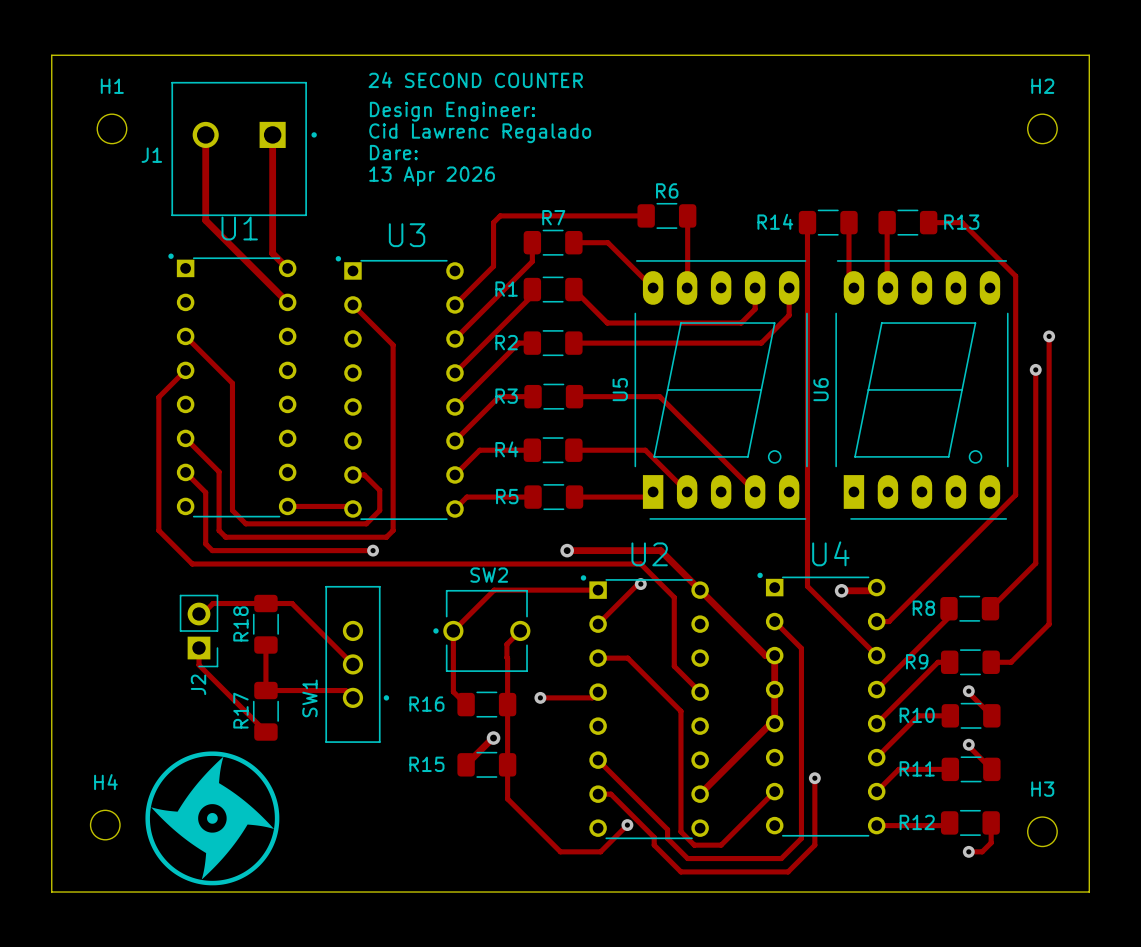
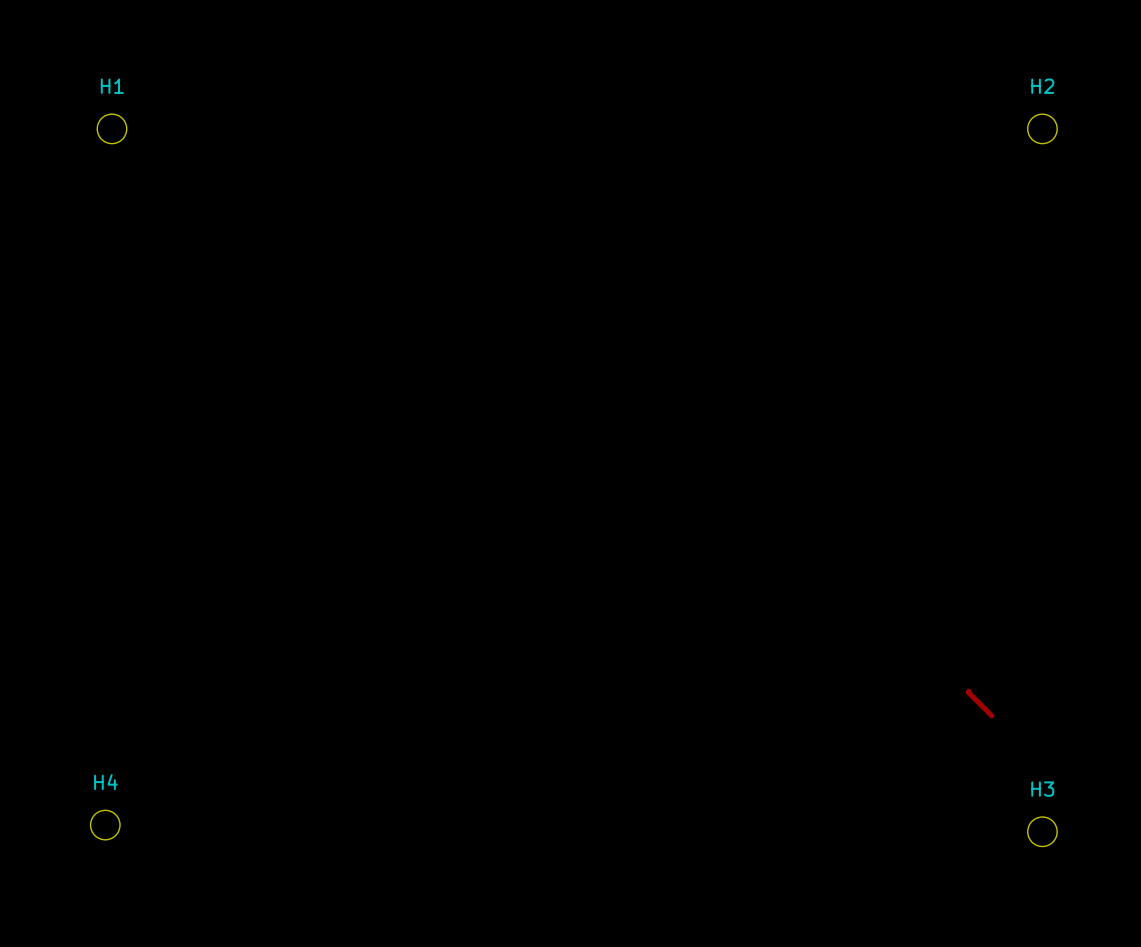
board edge: (51, 55) (1089, 55) (1089, 892) (51, 892) (51, 55) -> none
text: 24 SECOND COUNTER (475, 80) -> none
text: Design Engineer: (452, 111) -> none
text: Cid Lawrenc Regalado (480, 133) -> none
track: (205, 134) (205, 220) (287, 302) -> none
track: (272, 134) (272, 253) (287, 268) -> none
J1: (244, 148) -> none
text: Dare: (393, 152) -> none
text: 13 Apr 2026 (432, 176) -> none
track: (646, 215) (500, 215) (493, 222) (493, 266) (454, 304) -> none
R6: (666, 215) -> none
track: (687, 215) (687, 287) -> none
track: (807, 222) (807, 586) (876, 655) -> none
R14: (828, 222) -> none
track: (848, 222) (848, 282) (853, 287) -> none
track: (887, 222) (887, 287) -> none
R13: (907, 222) -> none
track: (928, 222) (962, 222) (1015, 276) (1015, 494) (889, 621) (876, 621) -> none
track: (532, 242) (532, 261) (454, 338) -> none
R7: (553, 242) -> none
track: (573, 242) (607, 242) (653, 287) -> none
track: (755, 287) (755, 309) (741, 323) (607, 323) (573, 289) -> none
track: (789, 287) (789, 315) (761, 343) (573, 343) -> none
track: (532, 289) (532, 295) (454, 372) -> none
R1: (553, 289) -> none
track: (352, 304) (393, 345) (393, 530) (386, 537) (225, 537) (219, 530) (219, 471) (185, 438) -> none
track: (185, 336) (232, 383) (232, 510) (245, 523) (366, 523) (379, 510) (379, 490) (364, 474) (352, 474) -> none
track: (1049, 336) (1049, 624) (1011, 662) (991, 662) -> none
via: (1049, 336) -> none
track: (532, 343) (518, 343) (454, 406) -> none
R2: (553, 343) -> none
track: (1035, 369) (1035, 563) (990, 608) -> none
via: (1035, 369) -> none
track: (185, 370) (158, 397) (158, 530) (192, 564) (640, 564) (674, 597) (674, 666) (700, 692) -> none
U1: (232, 385) -> none
U3: (399, 388) -> none
U5: (721, 389) -> none
U6: (921, 389) -> none
track: (533, 396) (499, 396) (454, 440) -> none
R3: (553, 396) -> none
track: (574, 396) (659, 396) (755, 491) -> none
track: (532, 450) (479, 450) (454, 474) -> none
R4: (553, 450) -> none
track: (573, 450) (645, 450) (687, 491) -> none
track: (185, 472) (205, 492) (205, 543) (212, 550) (373, 550) -> none
track: (653, 491) (648, 497) (574, 497) -> none
track: (533, 497) (466, 497) (454, 508) -> none
R5: (553, 497) -> none
track: (287, 506) (350, 506) (352, 508) -> none
via: (373, 550) -> none
track: (567, 550) (660, 550) (765, 655) (774, 655) (774, 723) (770, 723) (700, 794) -> none
via: (567, 550) -> none
track: (640, 584) (638, 584) (598, 624) -> none
via: (640, 584) -> none
track: (876, 587) (873, 590) (841, 590) -> none
track: (598, 590) (494, 590) (453, 630) (453, 691) (466, 704) -> none
via: (841, 590) -> none
track: (949, 608) (949, 617) (876, 689) -> none
R8: (969, 608) -> none
track: (199, 614) (202, 614) (213, 603) (292, 603) (352, 664) -> none
track: (774, 621) (801, 648) (801, 838) (781, 858) (687, 858) (667, 838) (667, 829) (598, 760) -> none
R18: (265, 624) -> none
SW2: (481, 630) -> none
track: (520, 630) (506, 644) (507, 798) (560, 851) (600, 851) (627, 825) -> none
J2: (199, 631) -> none
track: (265, 645) (265, 690) (345, 690) (352, 697) -> none
track: (199, 648) (199, 665) (265, 732) -> none
track: (598, 658) (627, 658) (680, 711) (680, 831) (694, 845) (721, 845) (774, 791) -> none
track: (949, 662) (938, 662) (876, 723) -> none
R9: (970, 662) -> none
SW1: (357, 664) -> none
via: (968, 691) -> none
track: (598, 692) (592, 697) (540, 697) -> none
via: (540, 697) -> none
R16: (486, 704) -> none
U4: (821, 704) -> none
U2: (644, 707) -> none
R17: (265, 711) -> none
track: (950, 715) (918, 715) (876, 757) -> none
R10: (971, 715) -> none
track: (493, 738) (466, 764) -> none
via: (493, 738) -> none
track: (968, 744) (991, 769) -> none
via: (968, 744) -> none
drawing: [145, 751, 280, 886] -> none
R15: (486, 764) -> none
track: (950, 769) (898, 769) (876, 791) -> none
R11: (971, 769) -> none
track: (814, 778) (814, 845) (788, 871) (680, 871) (654, 845) (654, 837) (610, 794) (598, 794) -> none
via: (814, 778) -> none
track: (949, 822) (946, 825) (876, 825) -> none
R12: (970, 822) -> none
track: (991, 822) (991, 842) (982, 851) (968, 851) -> none
via: (627, 825) -> none
via: (968, 851) -> none

